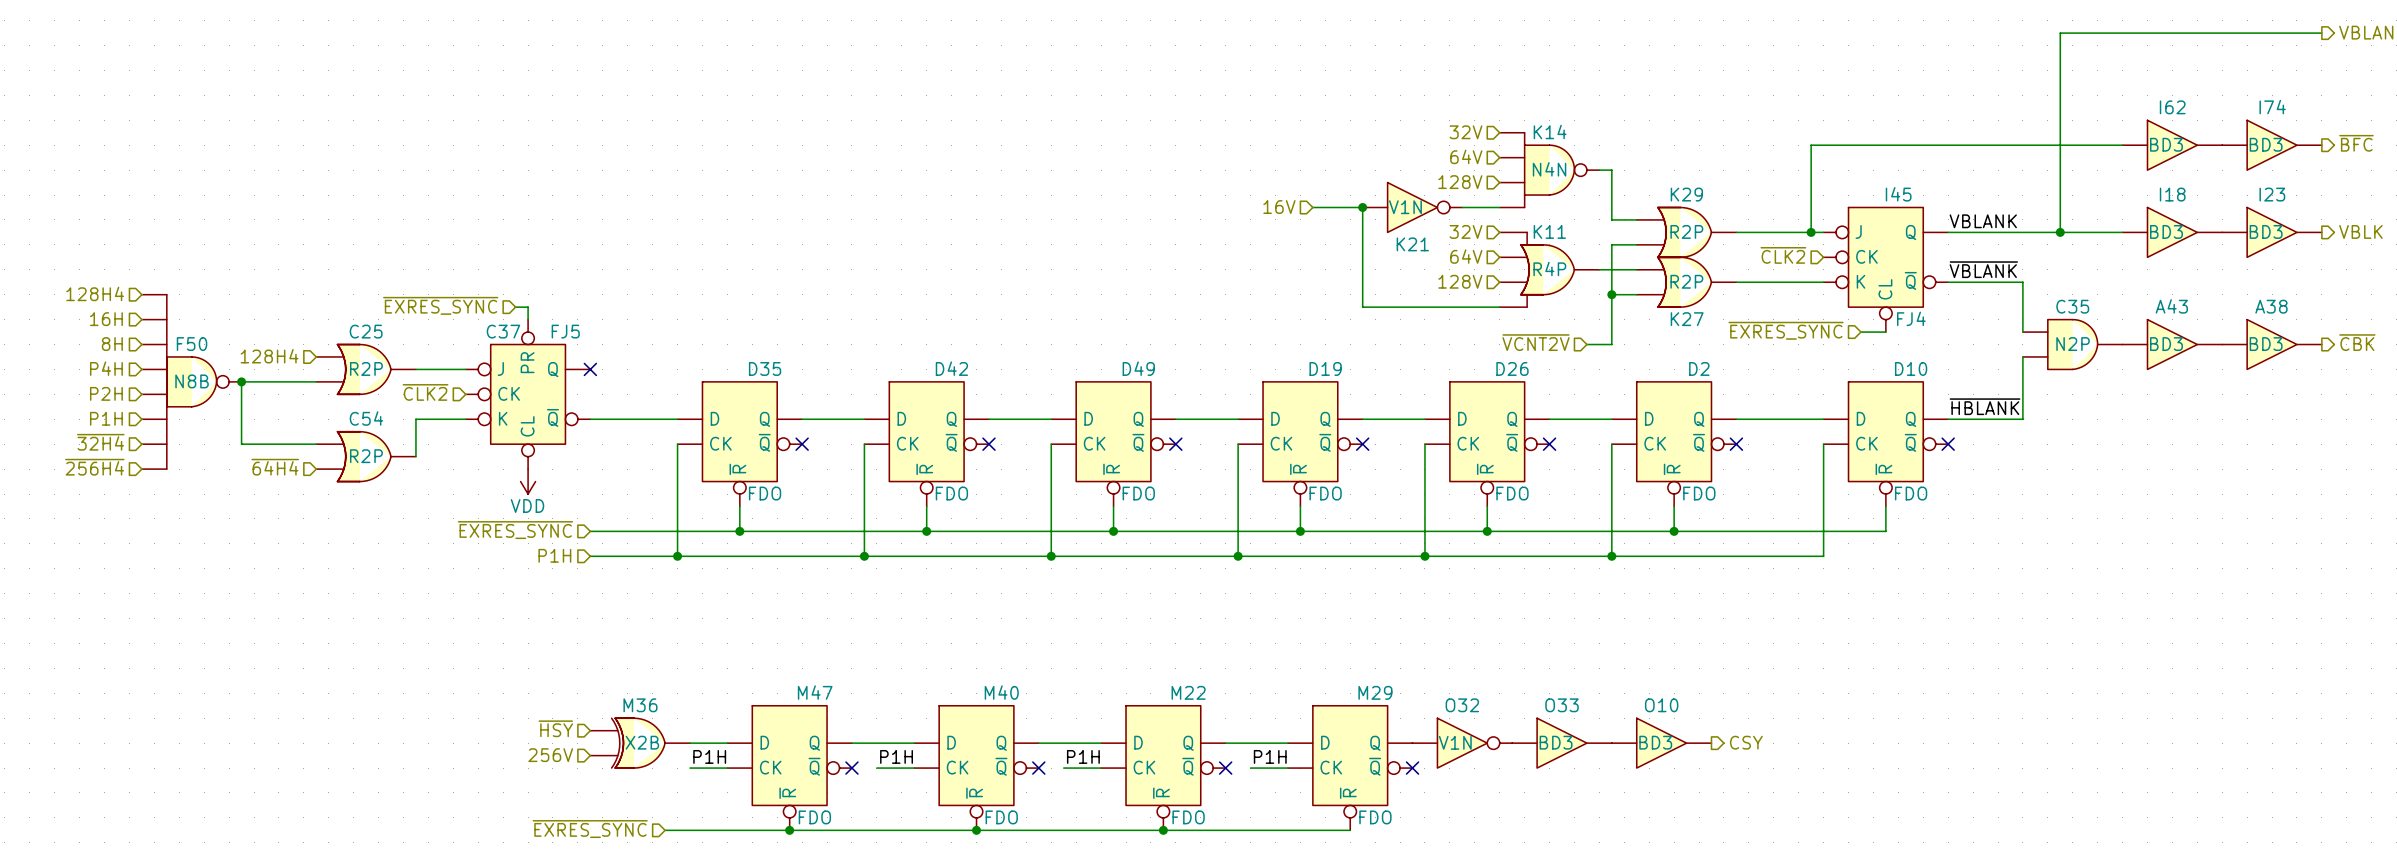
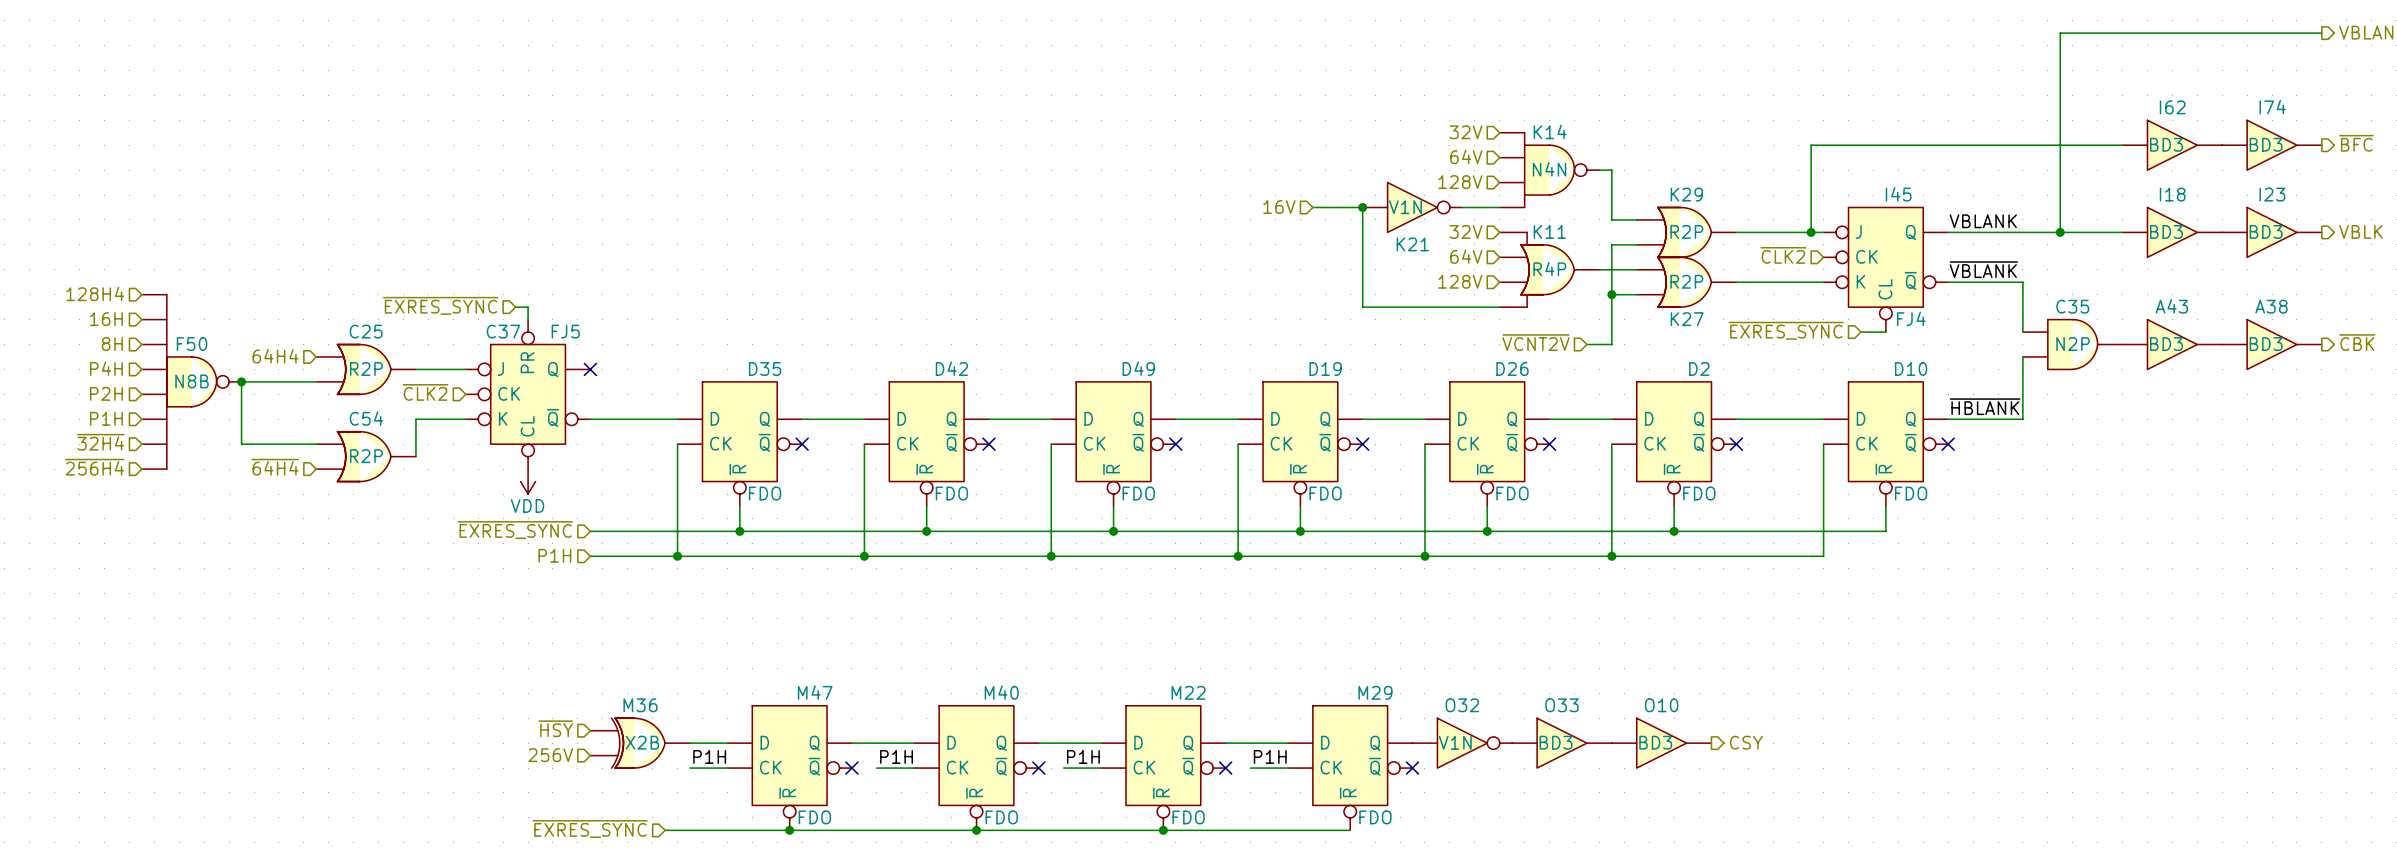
hierarchical label: 128H4 (269, 356) -> 64H4 (275, 356)

